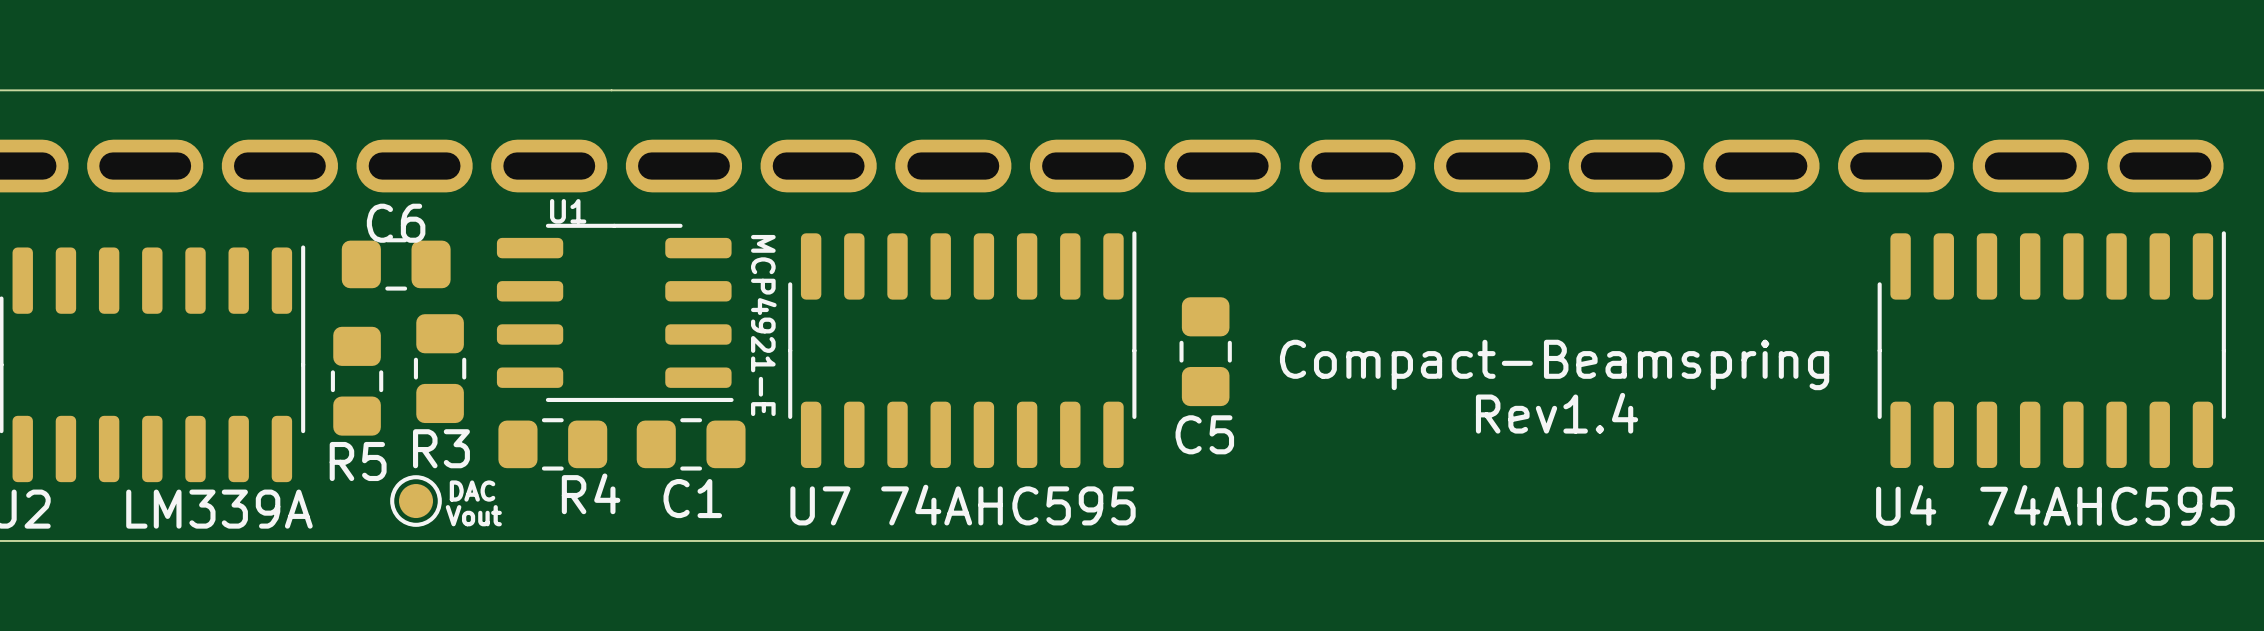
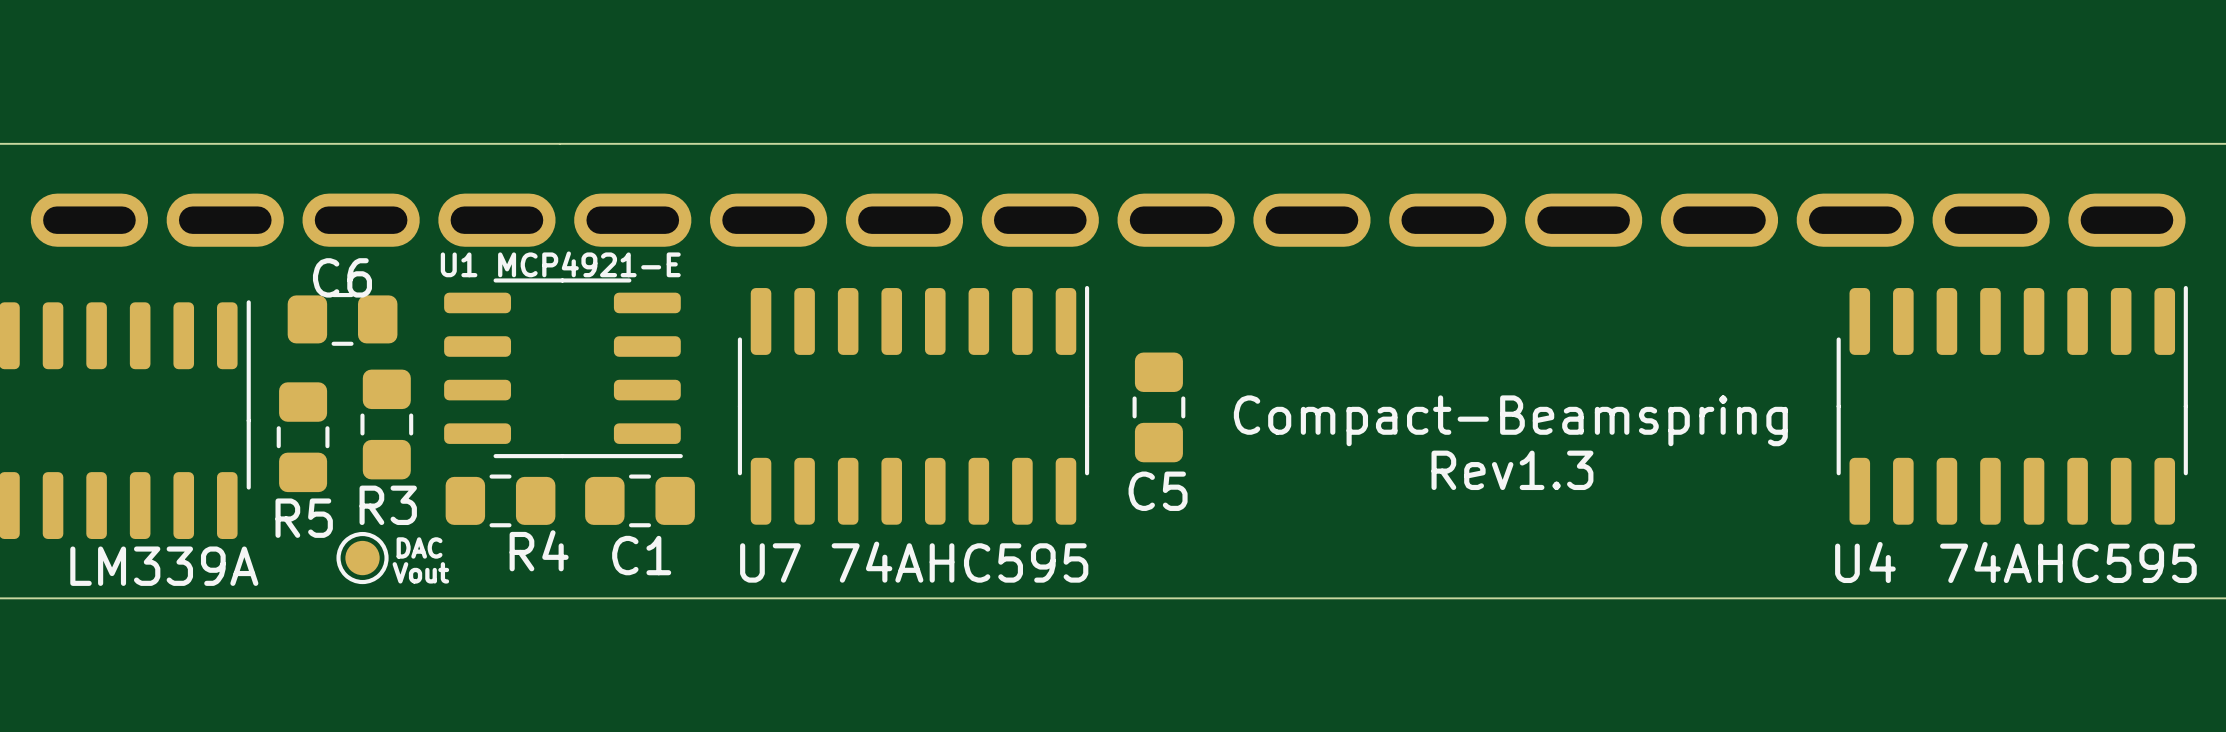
U1 name position: U1 (568, 211) -> U1 (459, 264)
U1 value rotation: 0° (763, 325) -> 90° counterclockwise (589, 264)
text: Rev1.4 (1557, 413) -> Rev1.3 (1512, 470)

